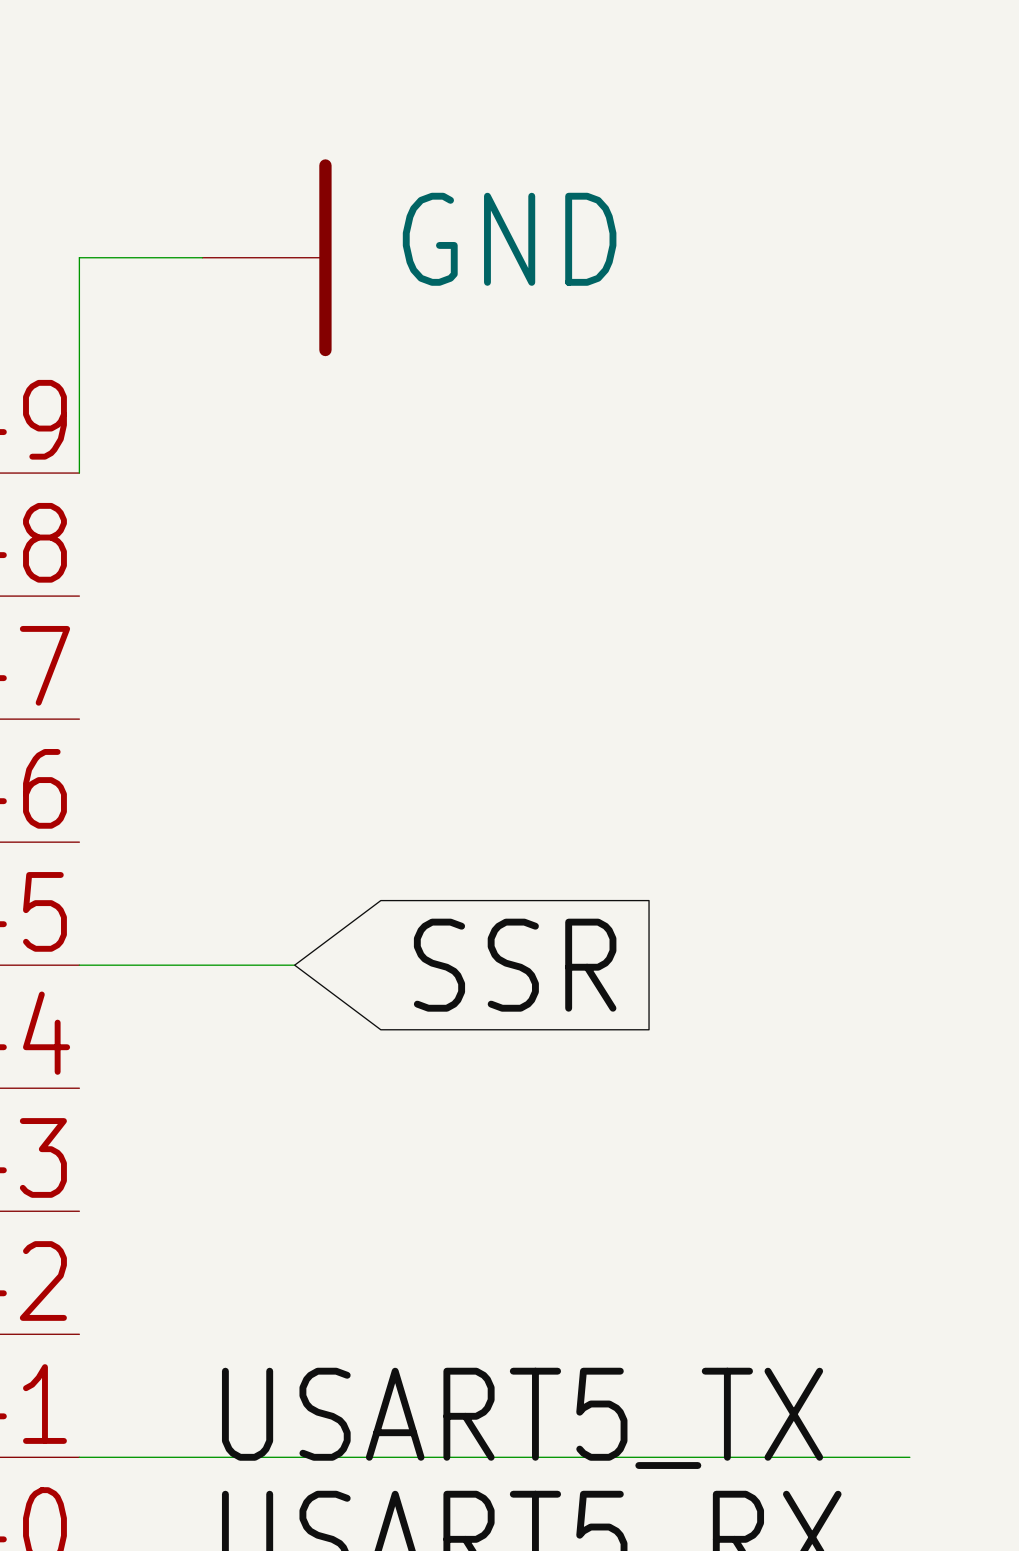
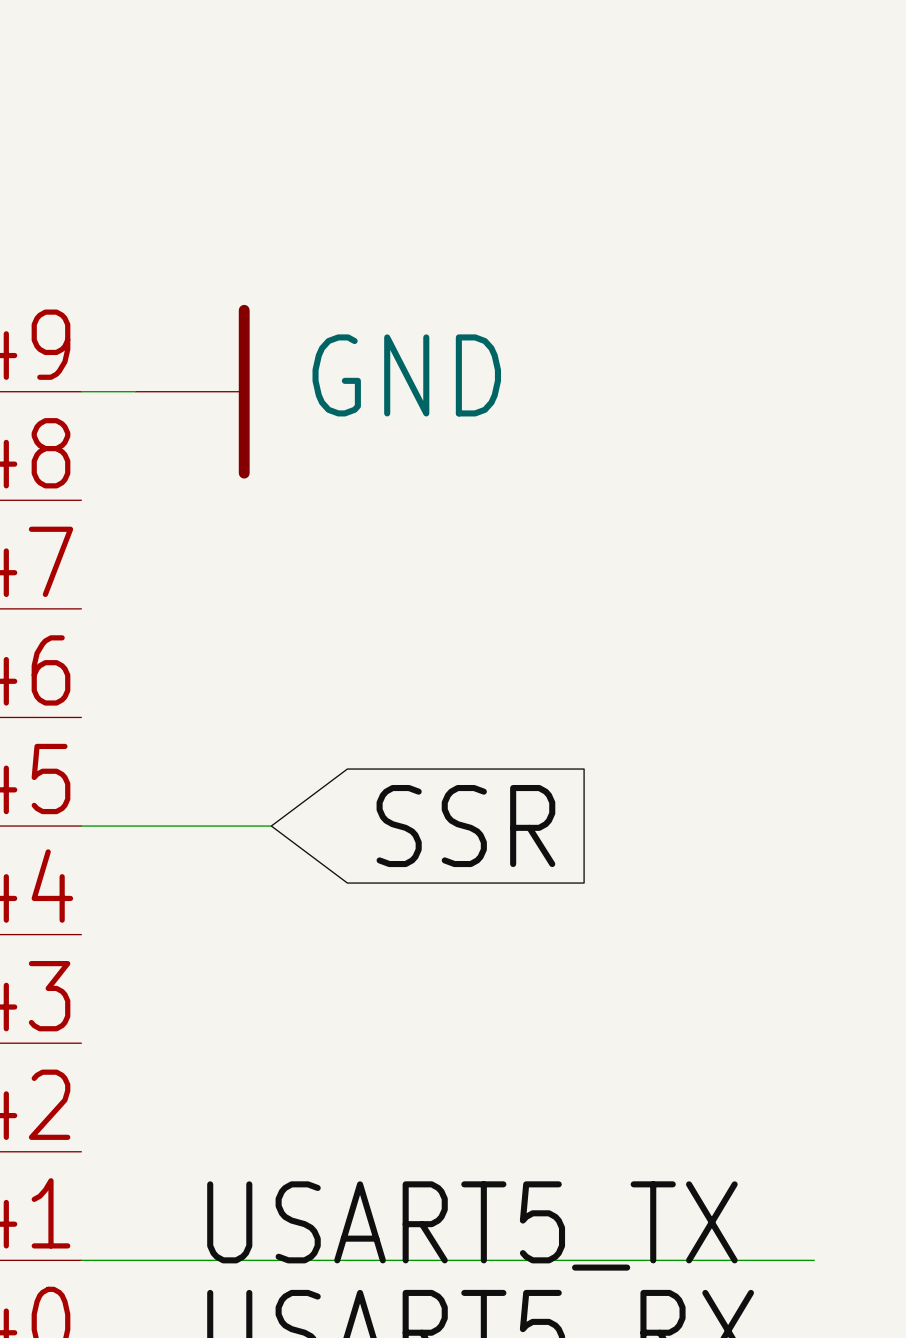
wire: (202, 257) (79, 257) (79, 473) -> (135, 391) (81, 391)
power symbol position: GND (267, 257) -> GND (192, 391)

